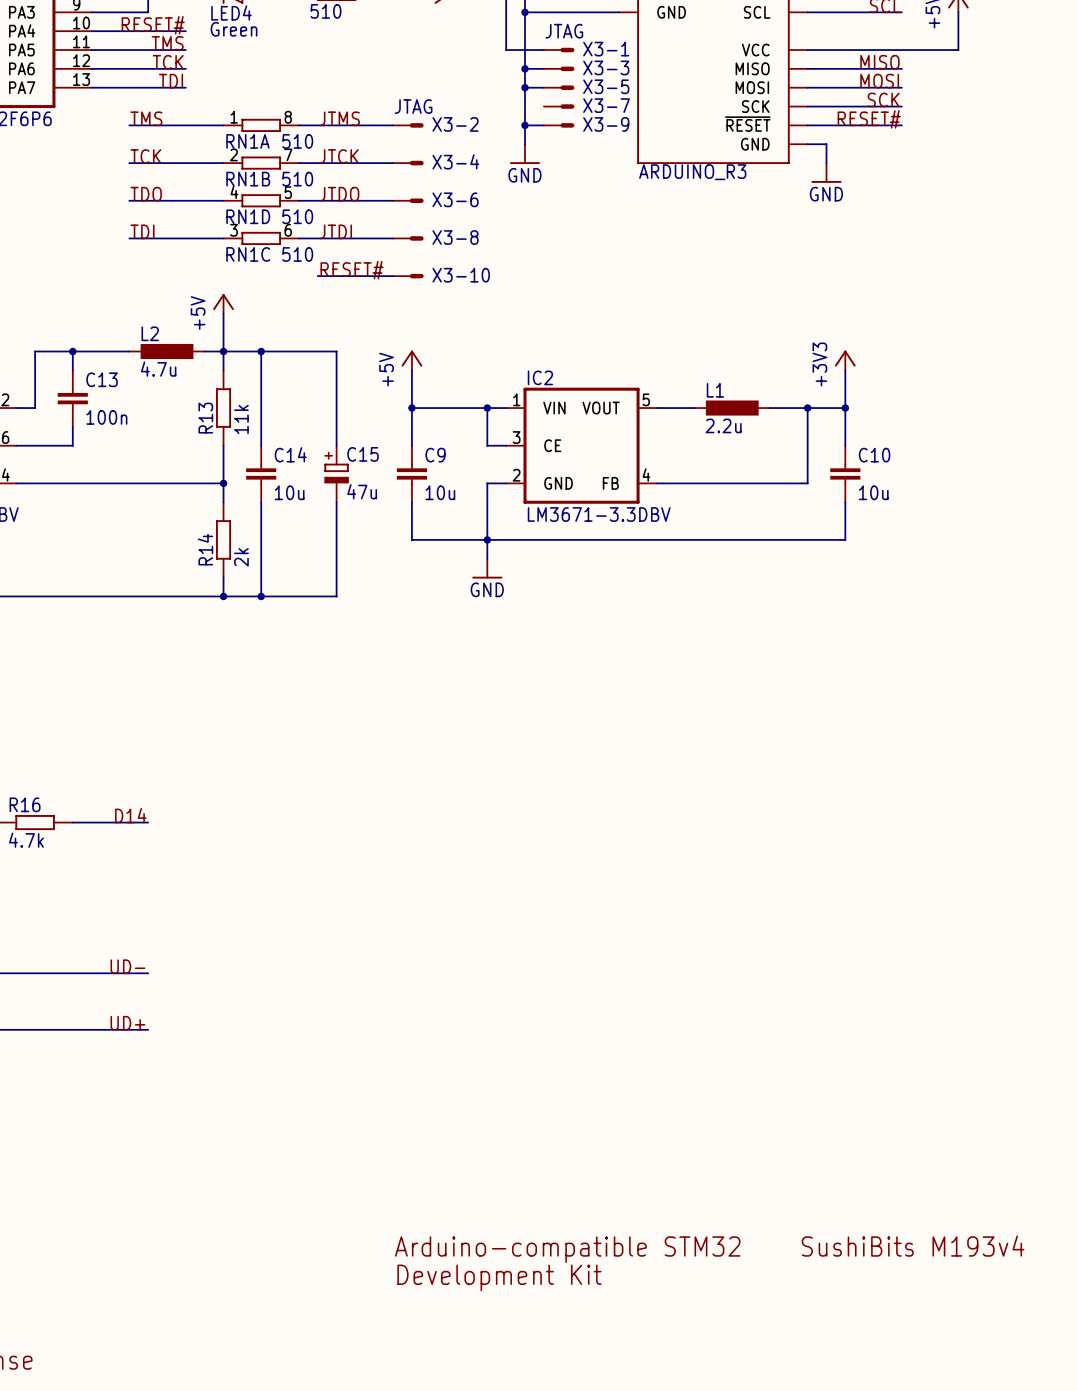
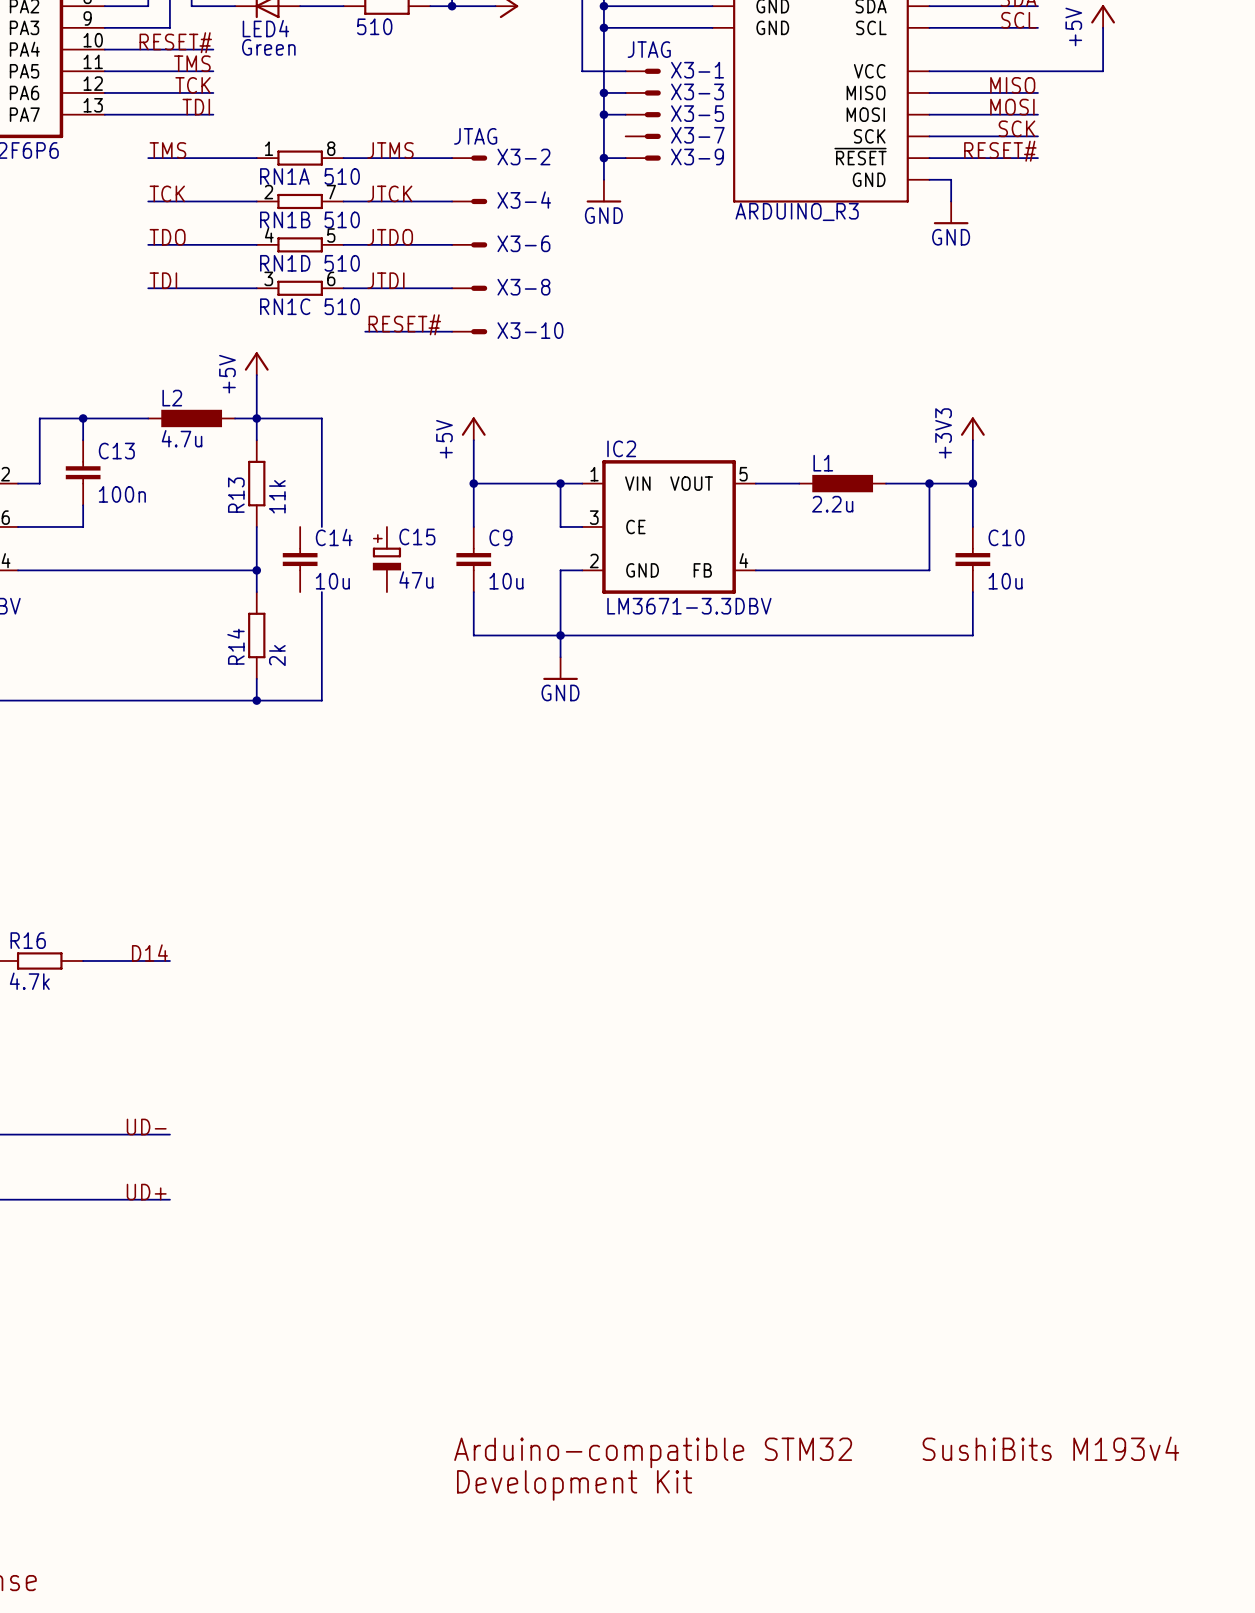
wire: (261, 351) (261, 445) -> none
junction: (261, 351) -> none
wire: (280, 351) (336, 351) (336, 445) -> (321, 418) (321, 526)
wire: (261, 502) (261, 596) -> none
wire: (336, 502) (336, 596) (280, 596) -> (321, 592) (321, 700)
junction: (261, 596) -> none

